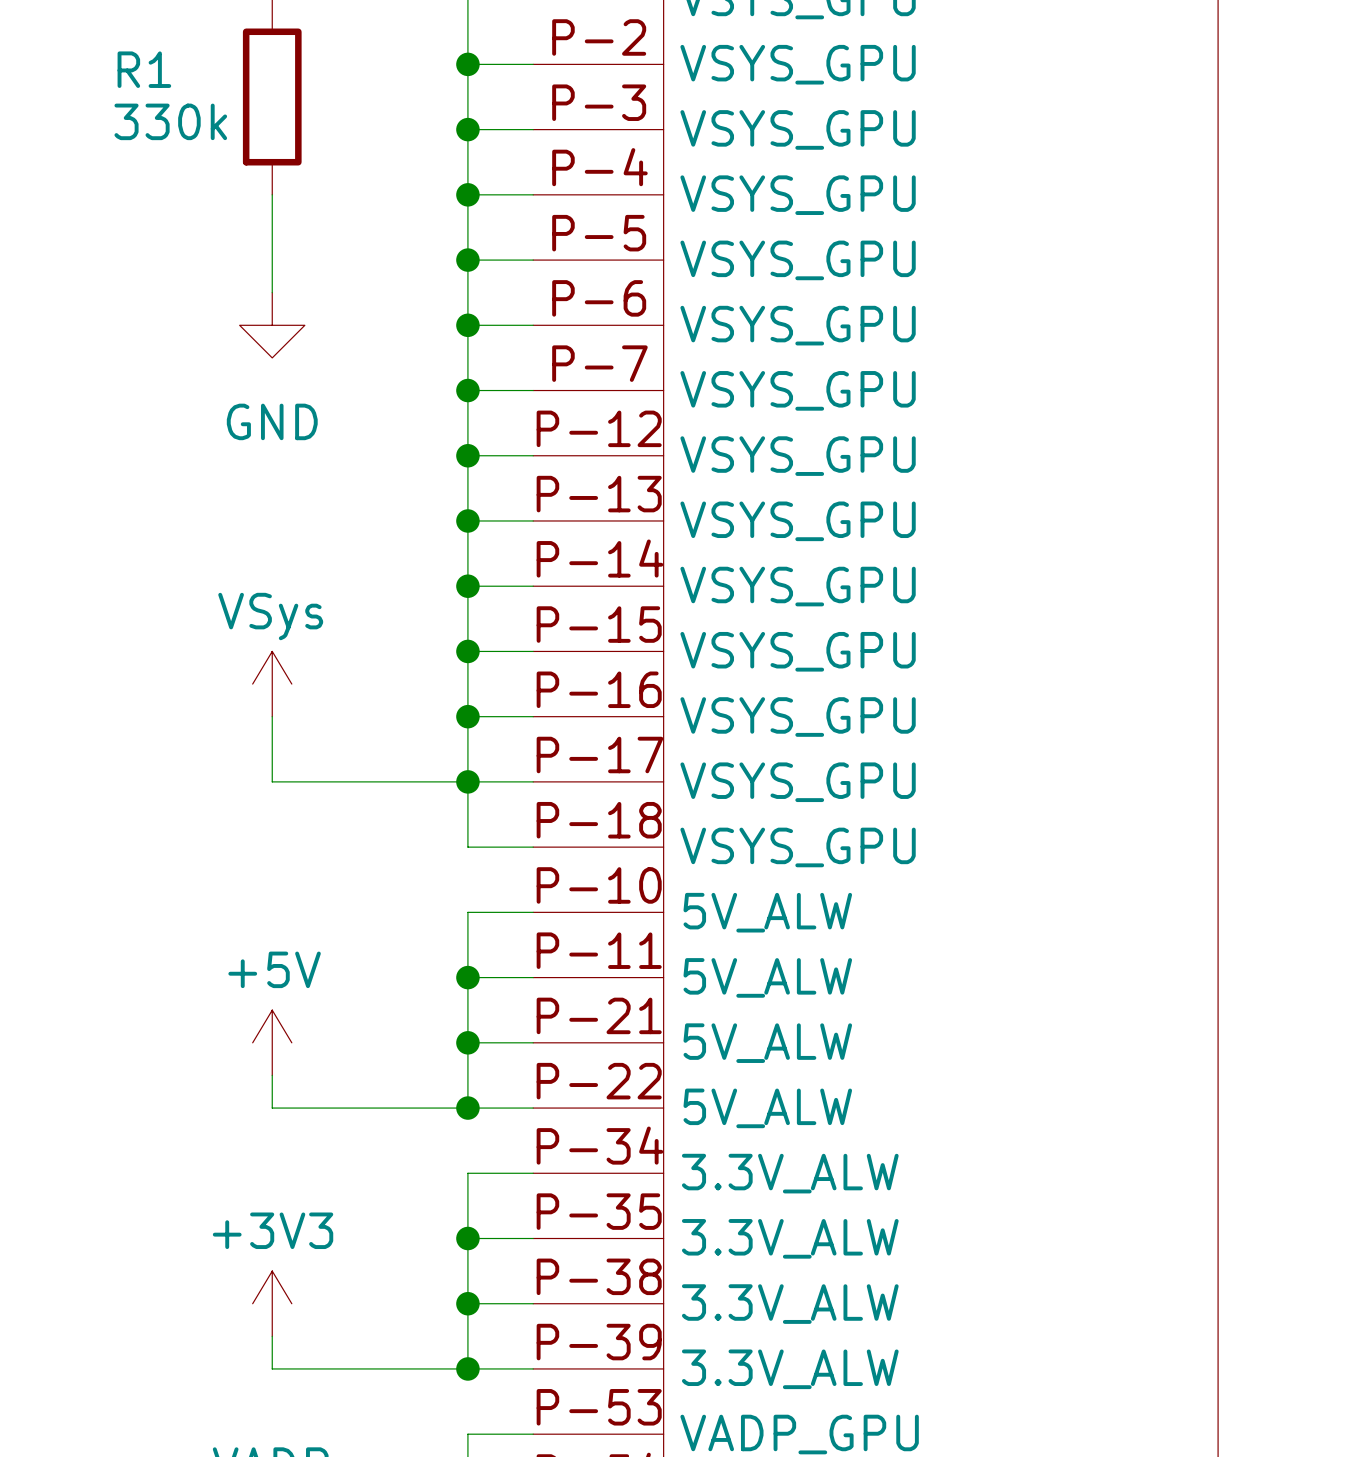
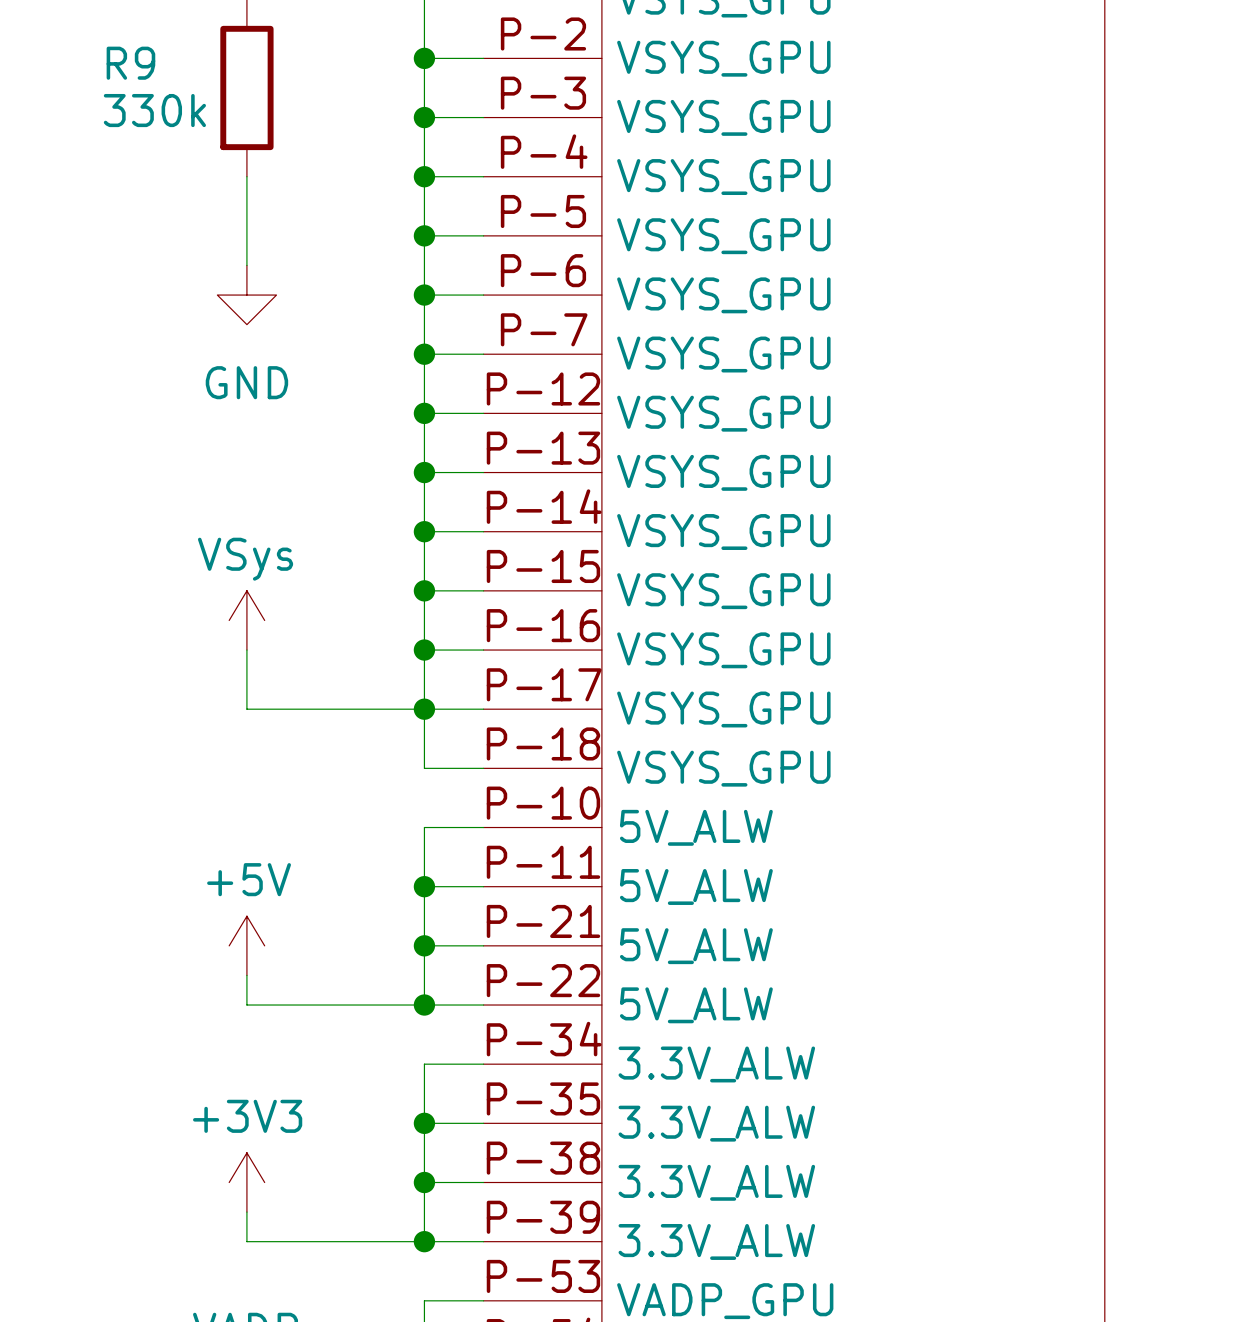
R1 name: R1 (144, 69) -> R9 (130, 63)

